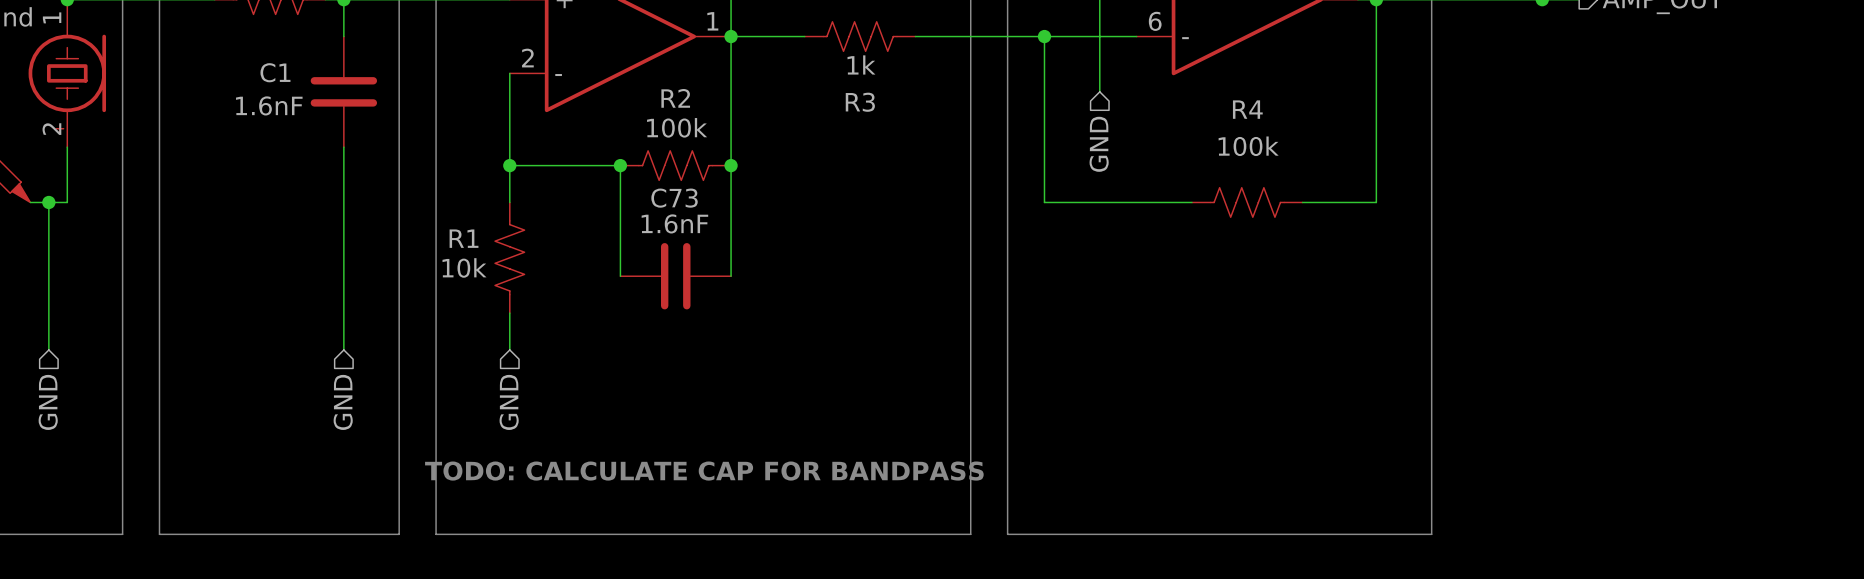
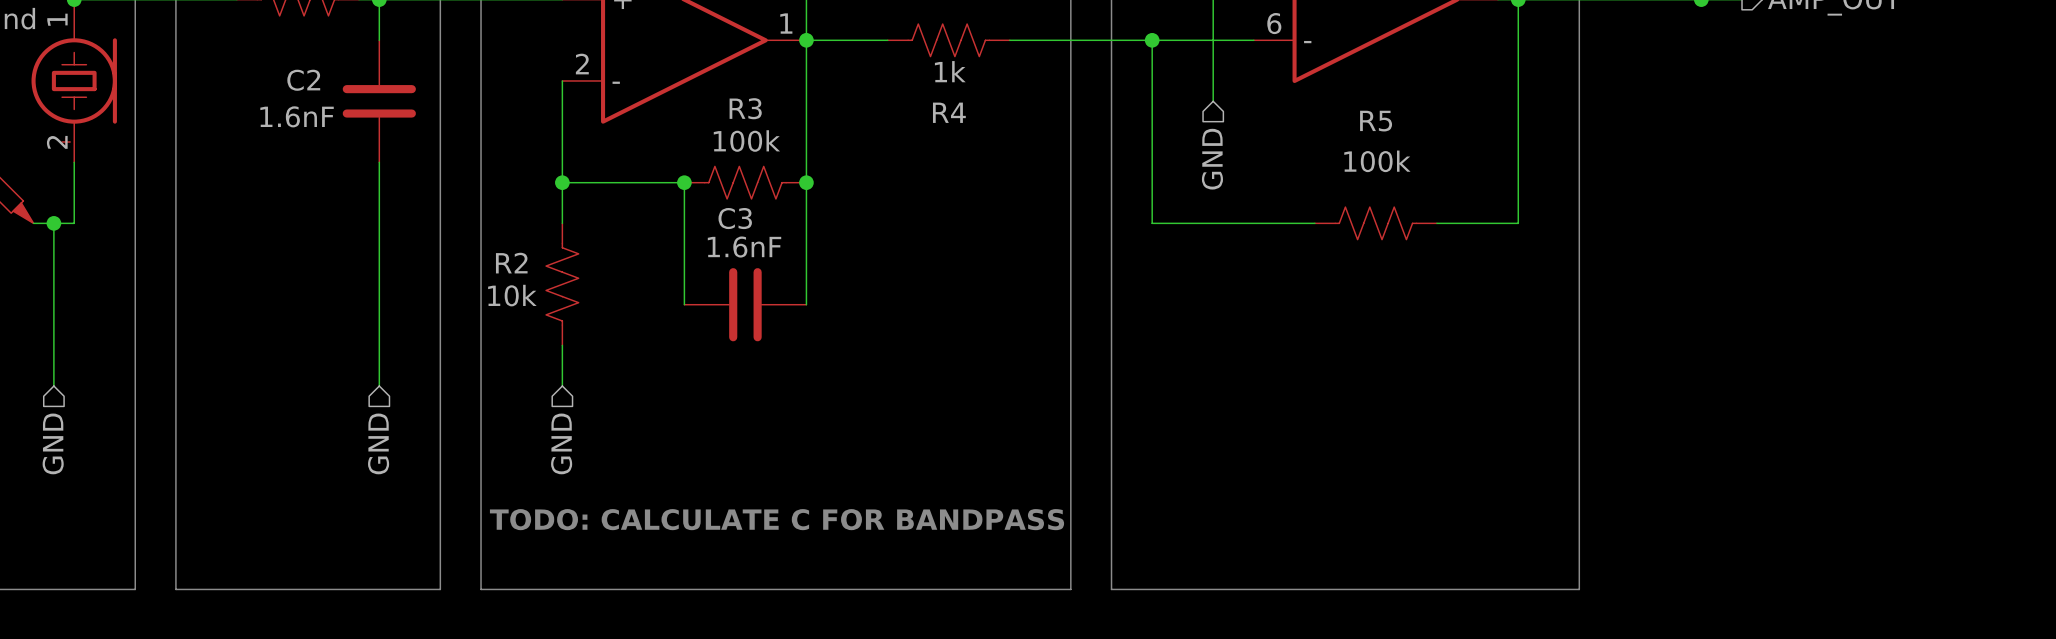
C1 name: C1 (275, 72) -> C2 (303, 80)
R2 name: R2 (675, 98) -> R3 (745, 108)
R3 name: R3 (860, 102) -> R4 (949, 112)
R4 name: R4 (1247, 109) -> R5 (1376, 121)
C73 name: C73 (674, 198) -> C3 (735, 218)
R1 name: R1 (464, 238) -> R2 (511, 263)
text: TODO: CALCULATE CAP FOR BANDPASS (704, 471) -> TODO: CALCULATE C FOR BANDPASS (777, 519)

